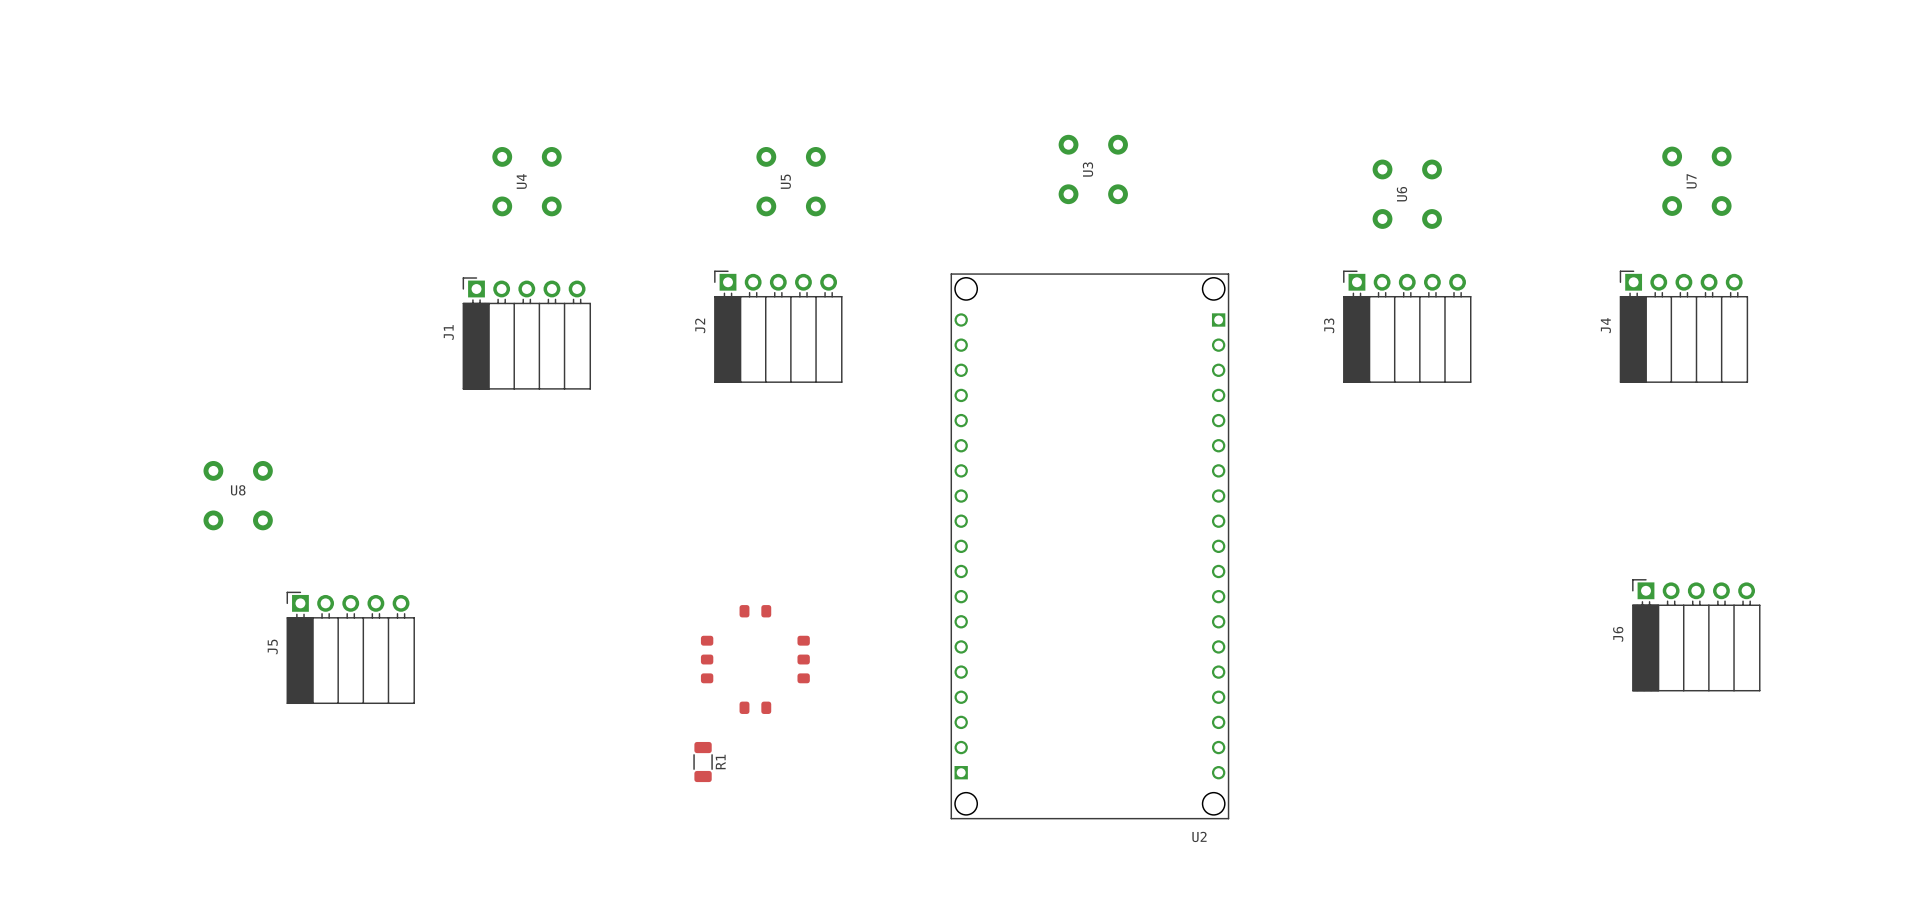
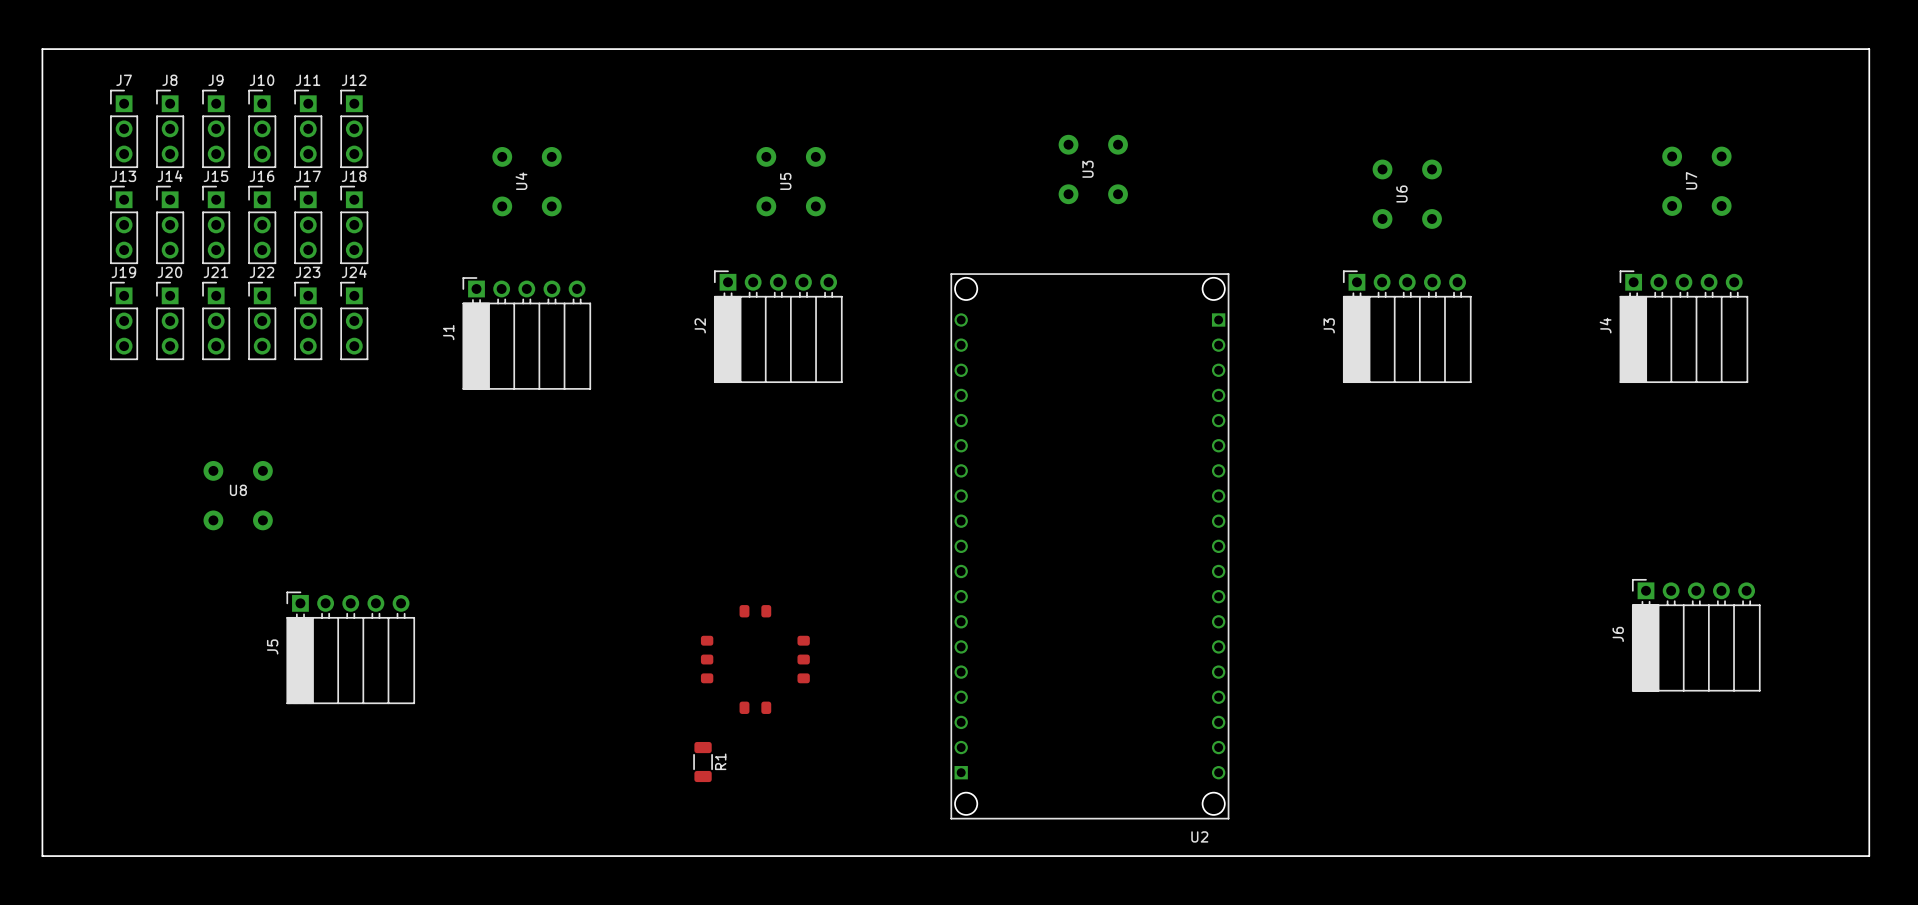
board edge: none -> (42, 49) (1869, 49) (1869, 856) (42, 856) (42, 49)
J7: none -> (124, 128)
J8: none -> (170, 128)
J9: none -> (216, 128)
J10: none -> (262, 128)
J11: none -> (308, 128)
J12: none -> (354, 128)
J13: none -> (124, 224)
J14: none -> (170, 224)
J15: none -> (216, 224)
J16: none -> (262, 224)
J17: none -> (308, 224)
J18: none -> (354, 224)
J19: none -> (124, 320)
J20: none -> (170, 320)
J21: none -> (216, 320)
J22: none -> (262, 320)
J23: none -> (308, 320)
J24: none -> (354, 320)

